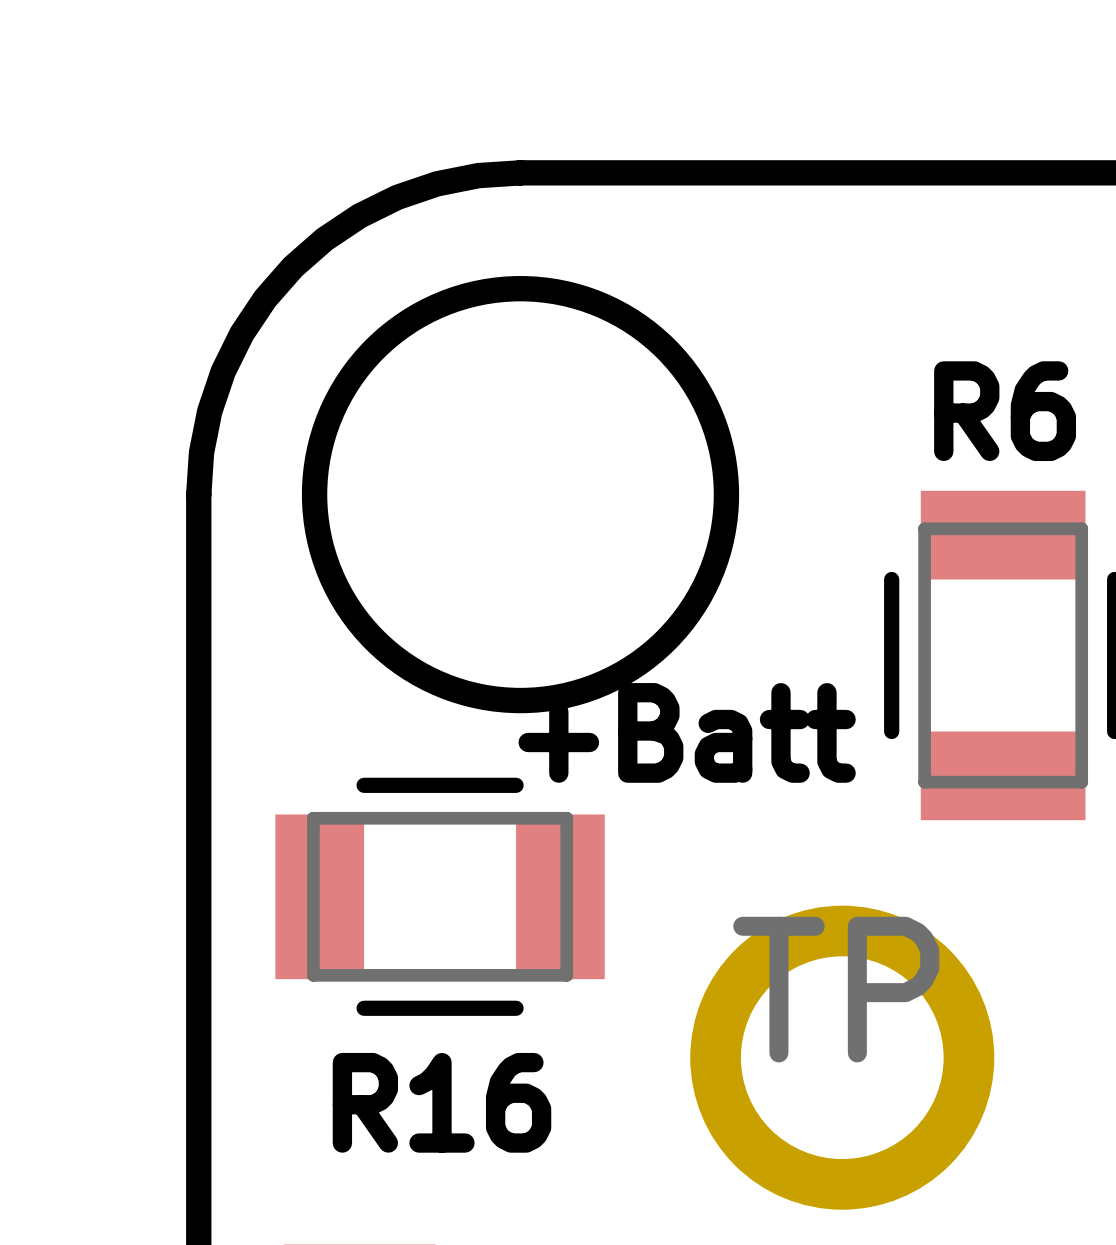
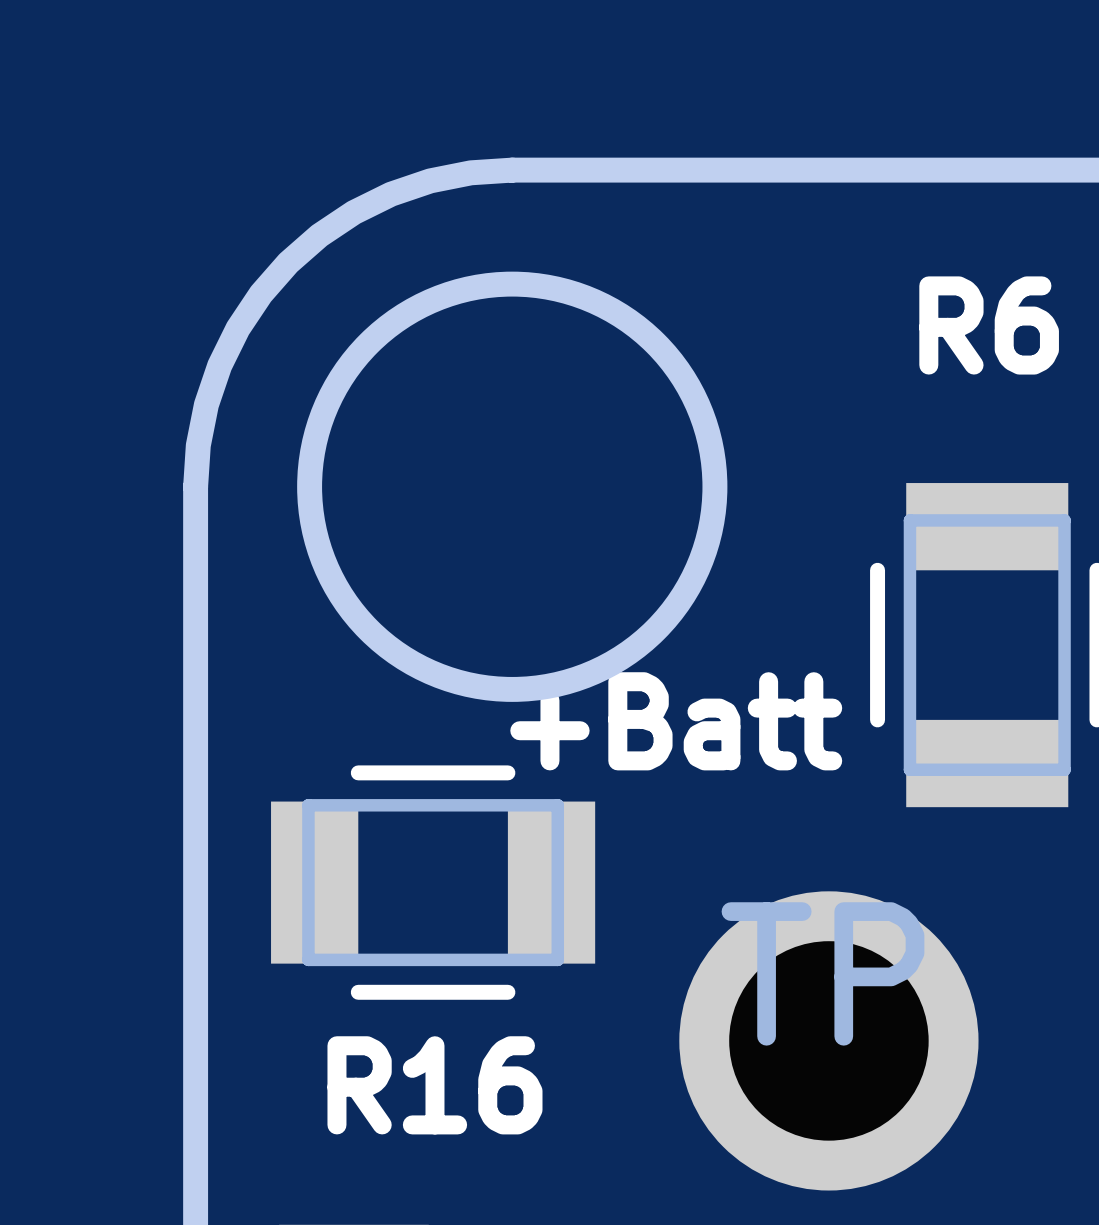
R6 name position: R6 (1005, 411) -> R6 (989, 325)

